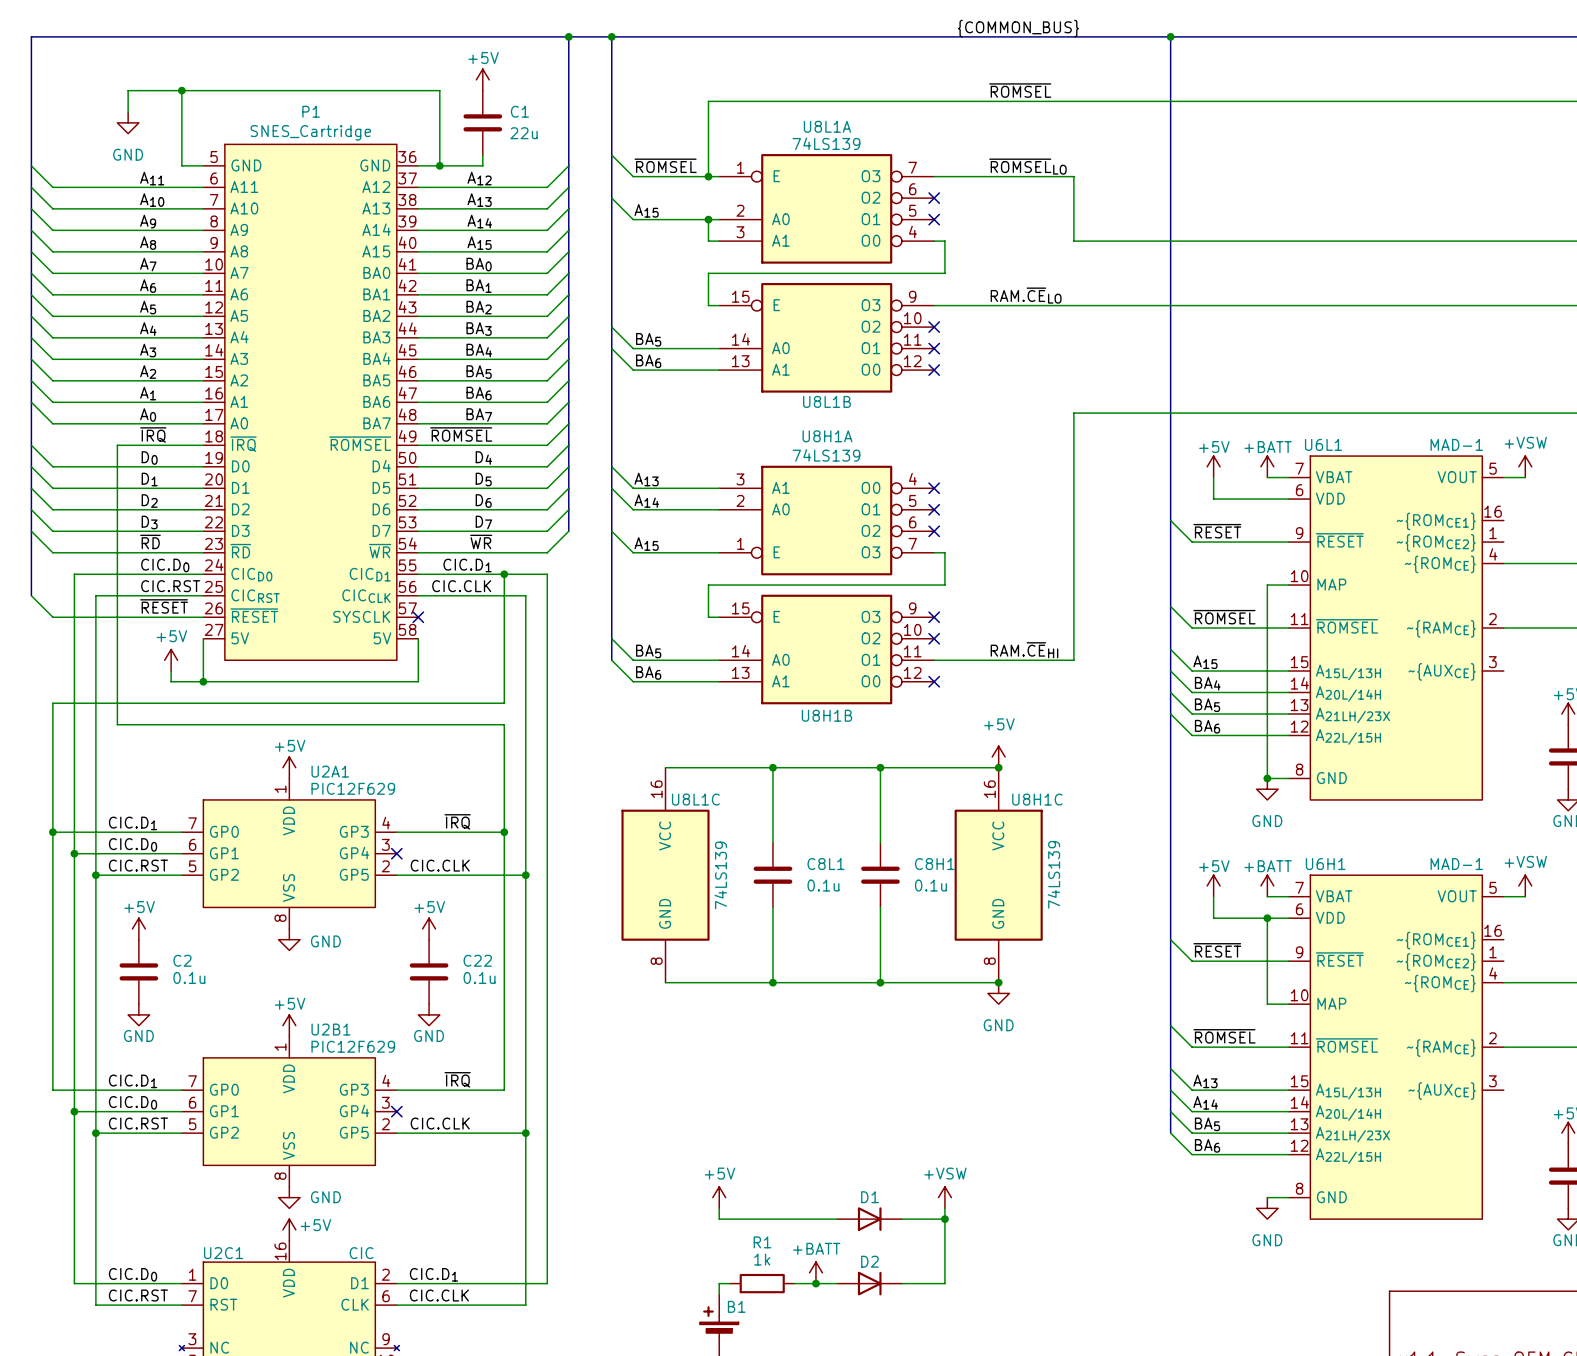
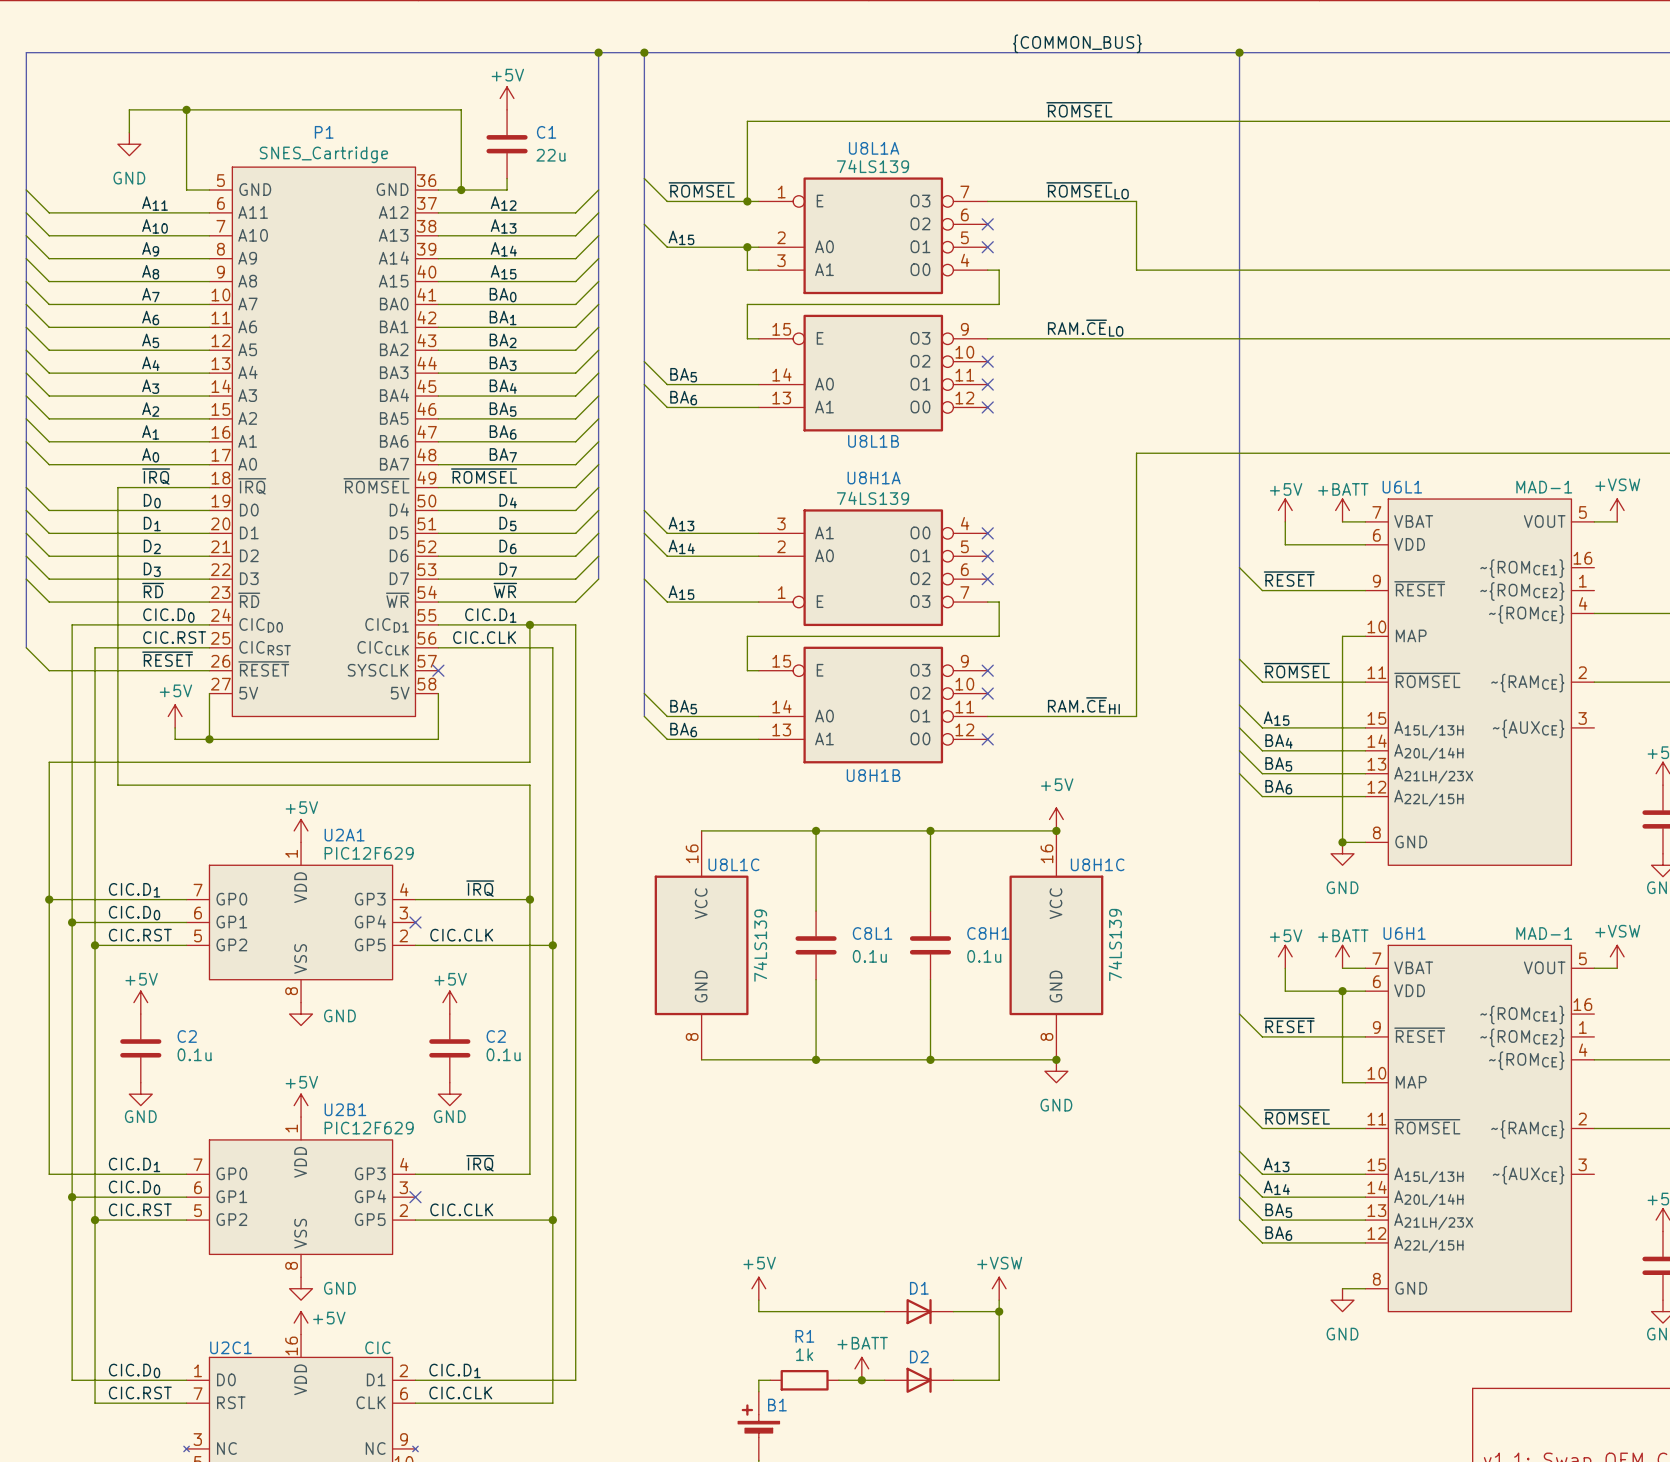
C22 name: C22 (477, 960) -> C2 (496, 1036)

